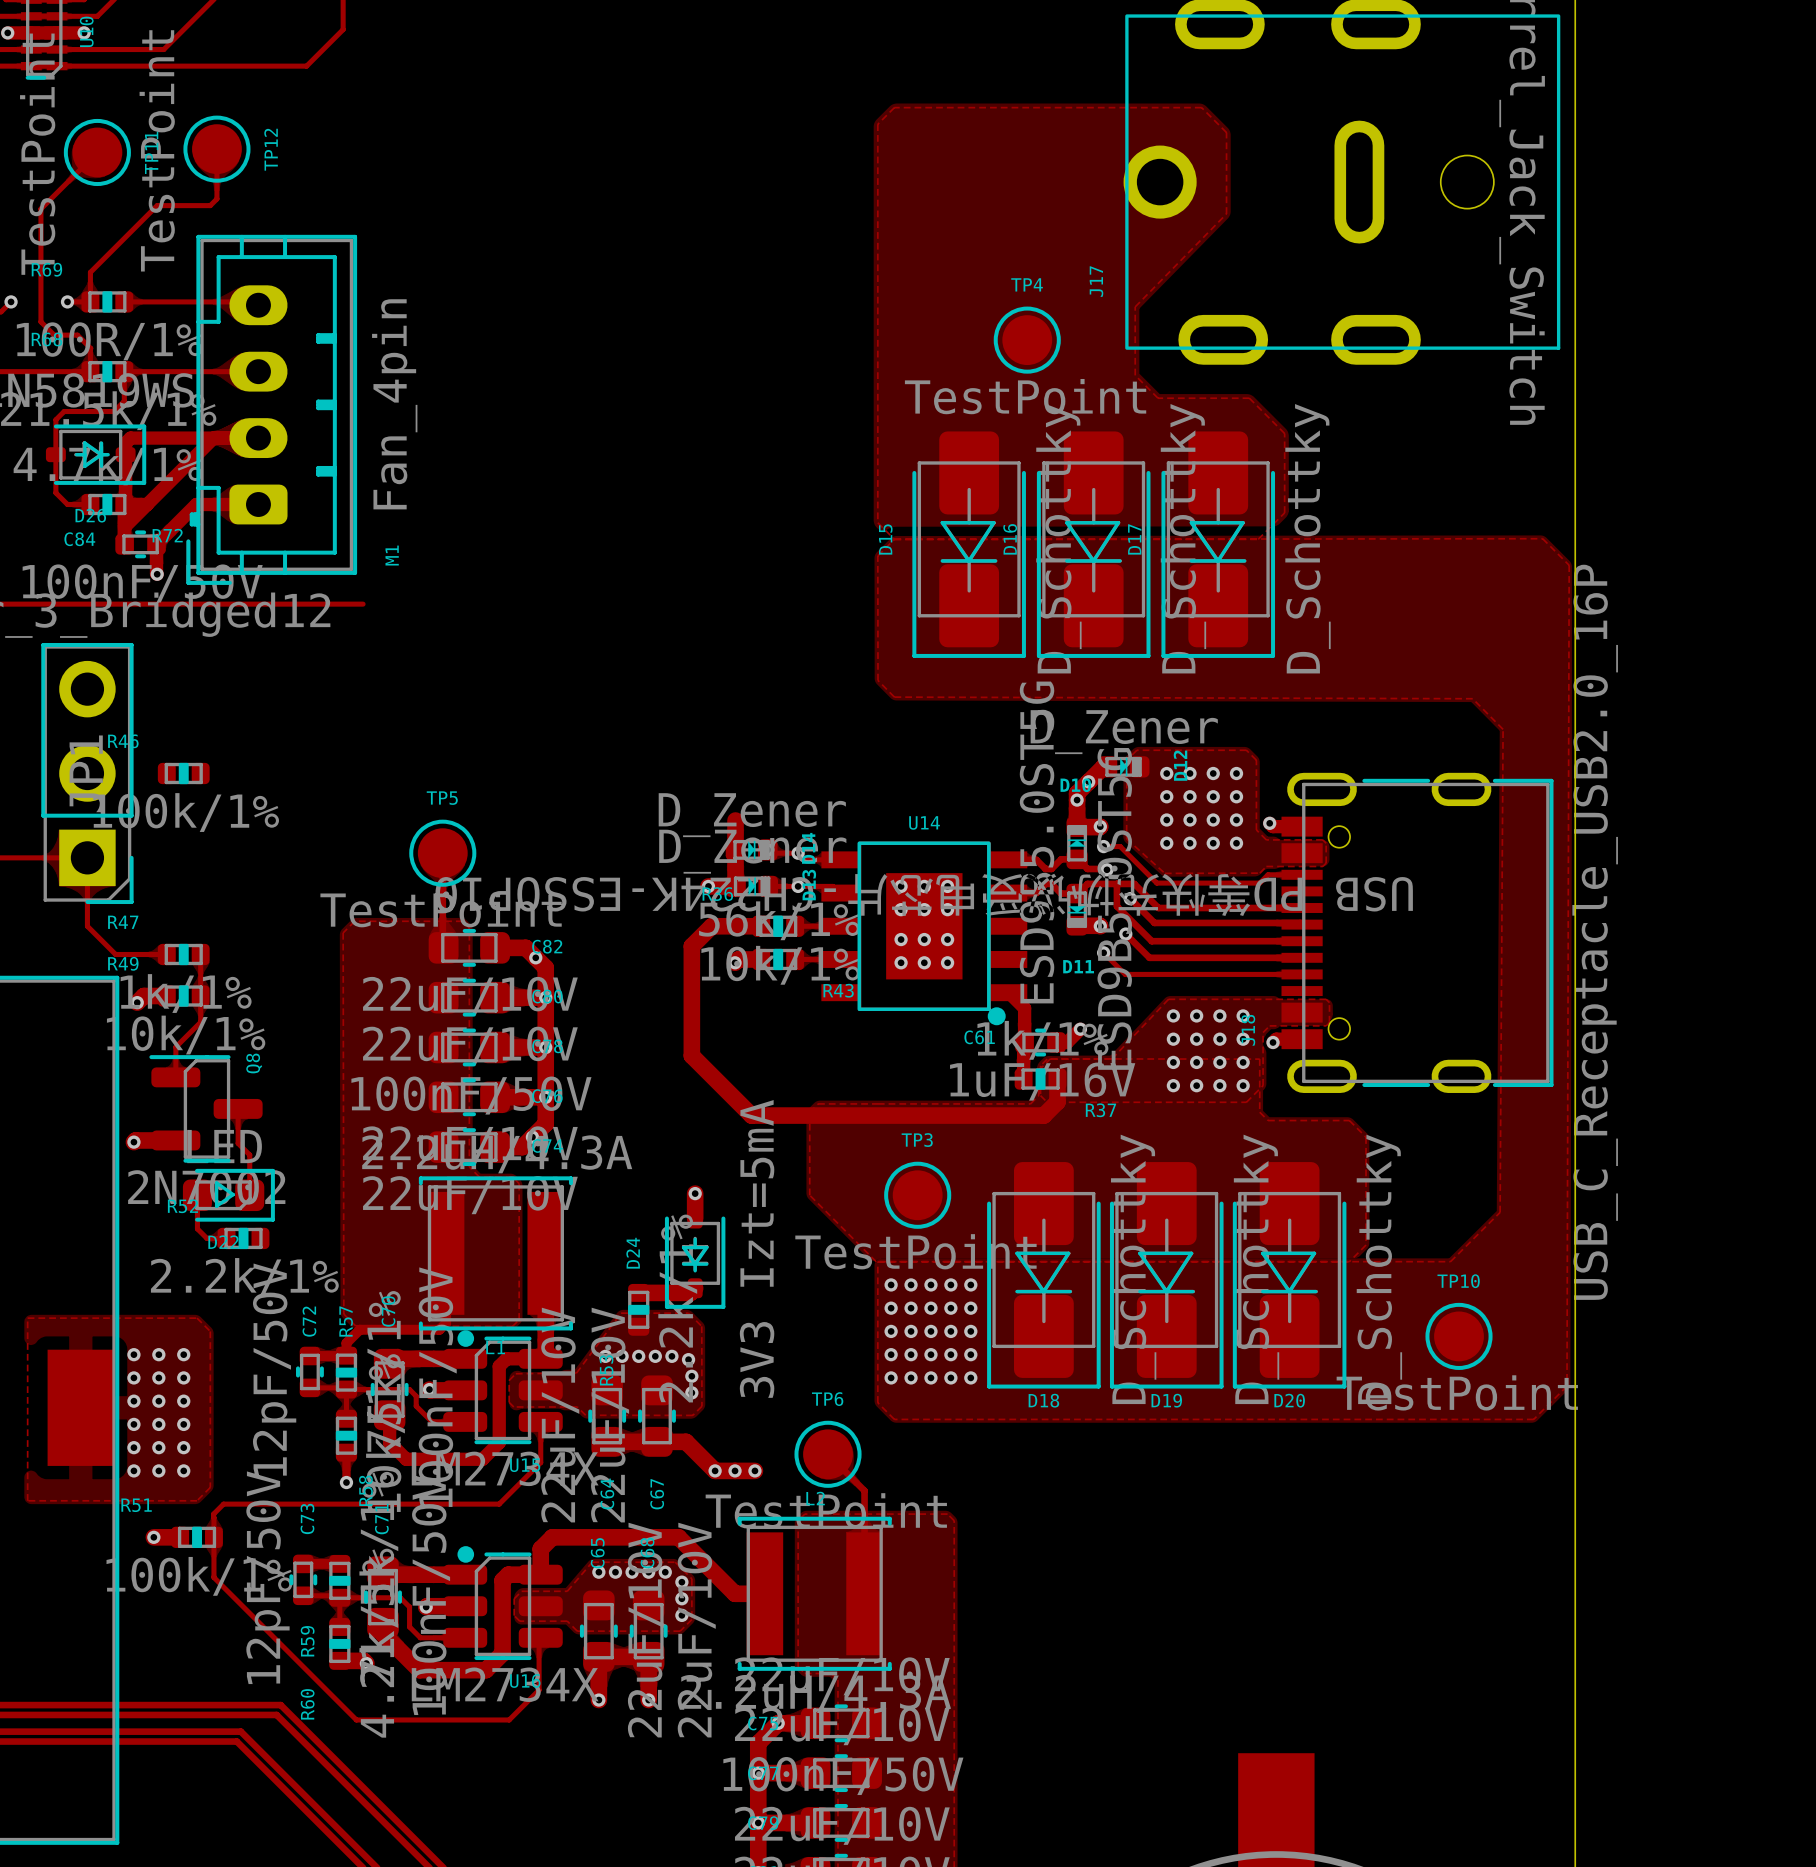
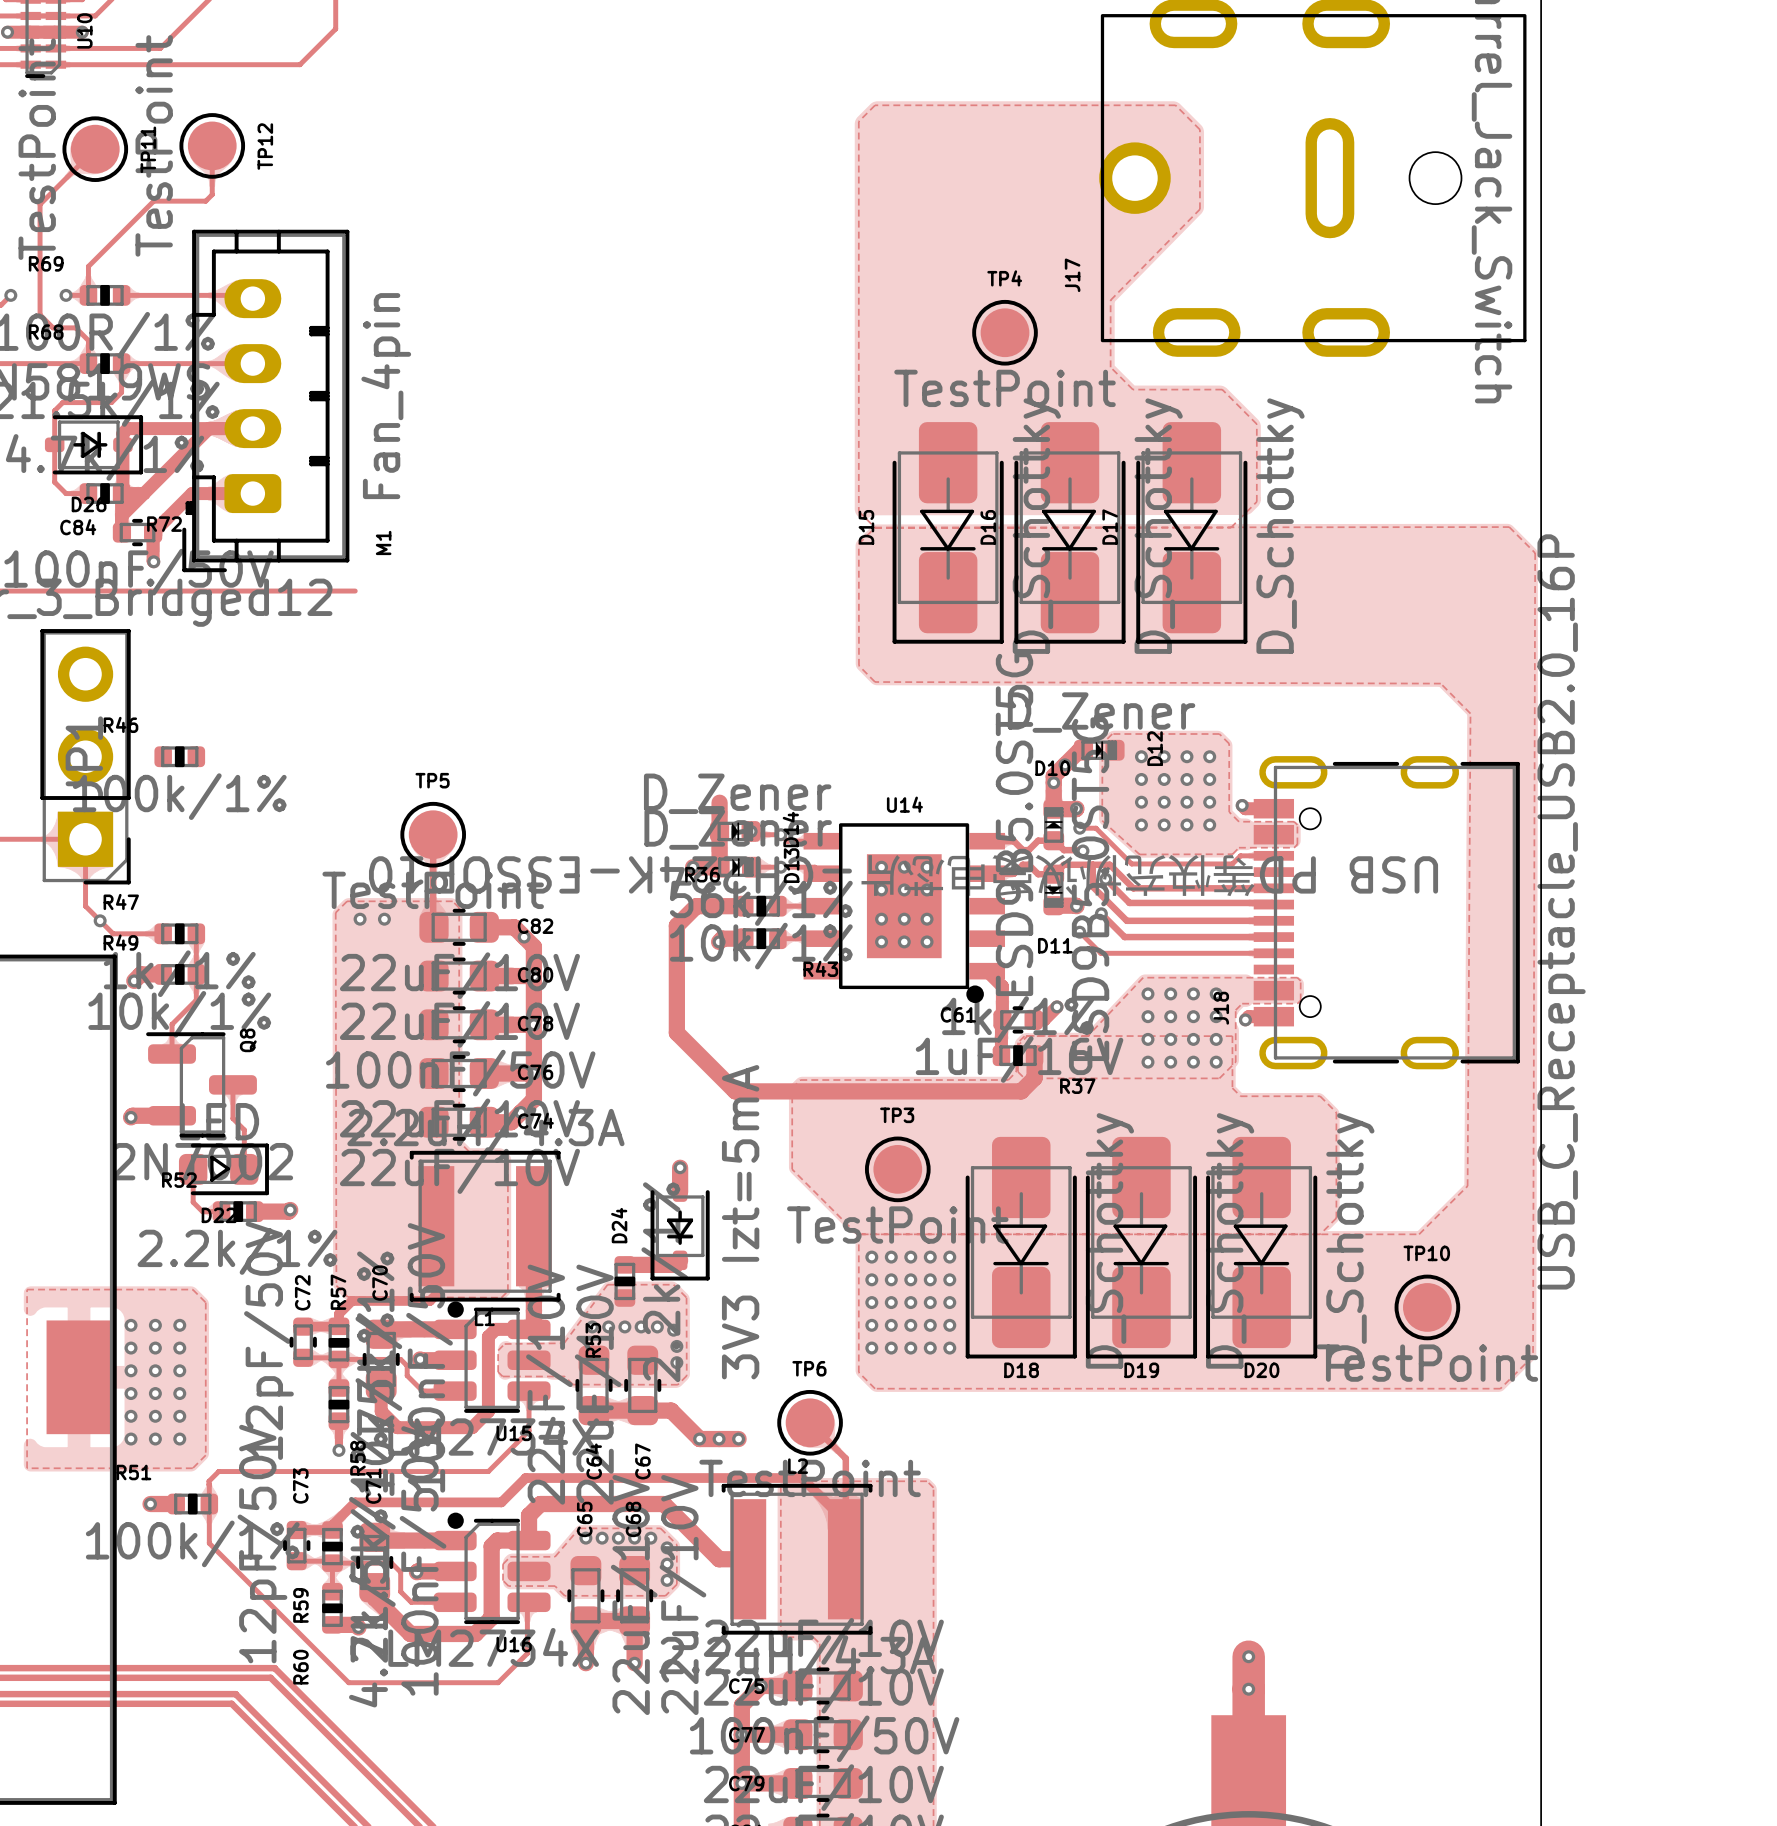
via: none -> (360, 919)
via: none -> (384, 919)
via: none -> (100, 920)
track: none -> (290, 1209) (288, 1211) (254, 1211)
via: none -> (290, 1209)
track: none -> (332, 1530) (332, 1525) (355, 1502) (501, 1502) (525, 1478) (801, 1478) (845, 1521) (845, 1559)
track: none -> (1248, 1656) (1248, 1788)
via: none -> (1248, 1656)
via: none -> (1248, 1689)

